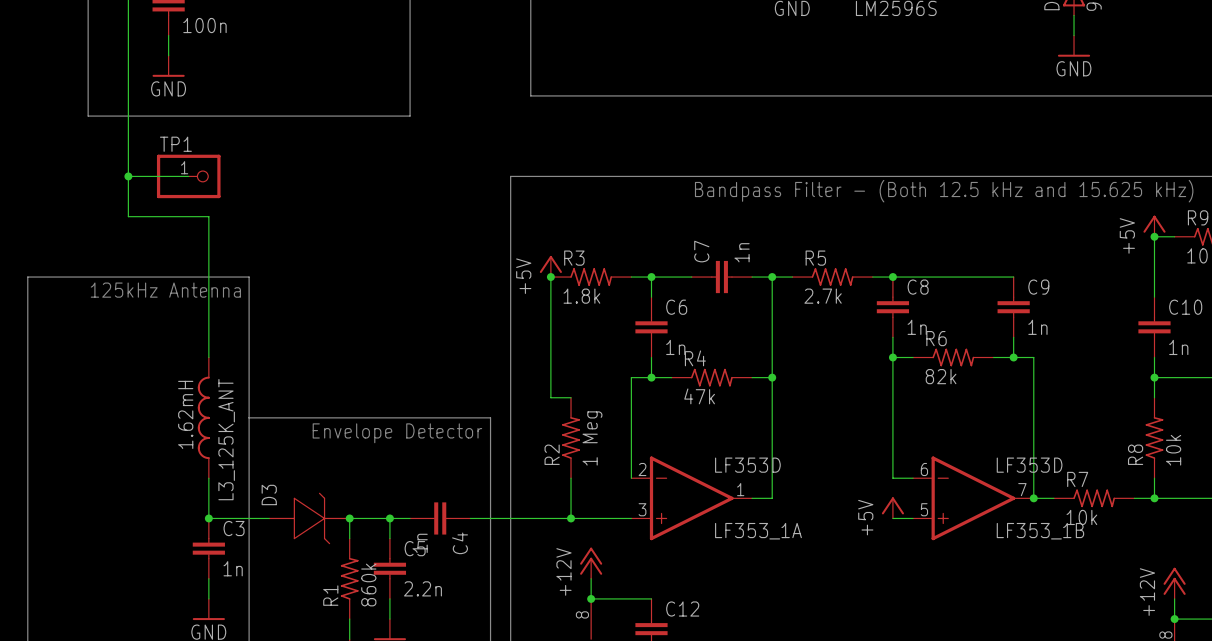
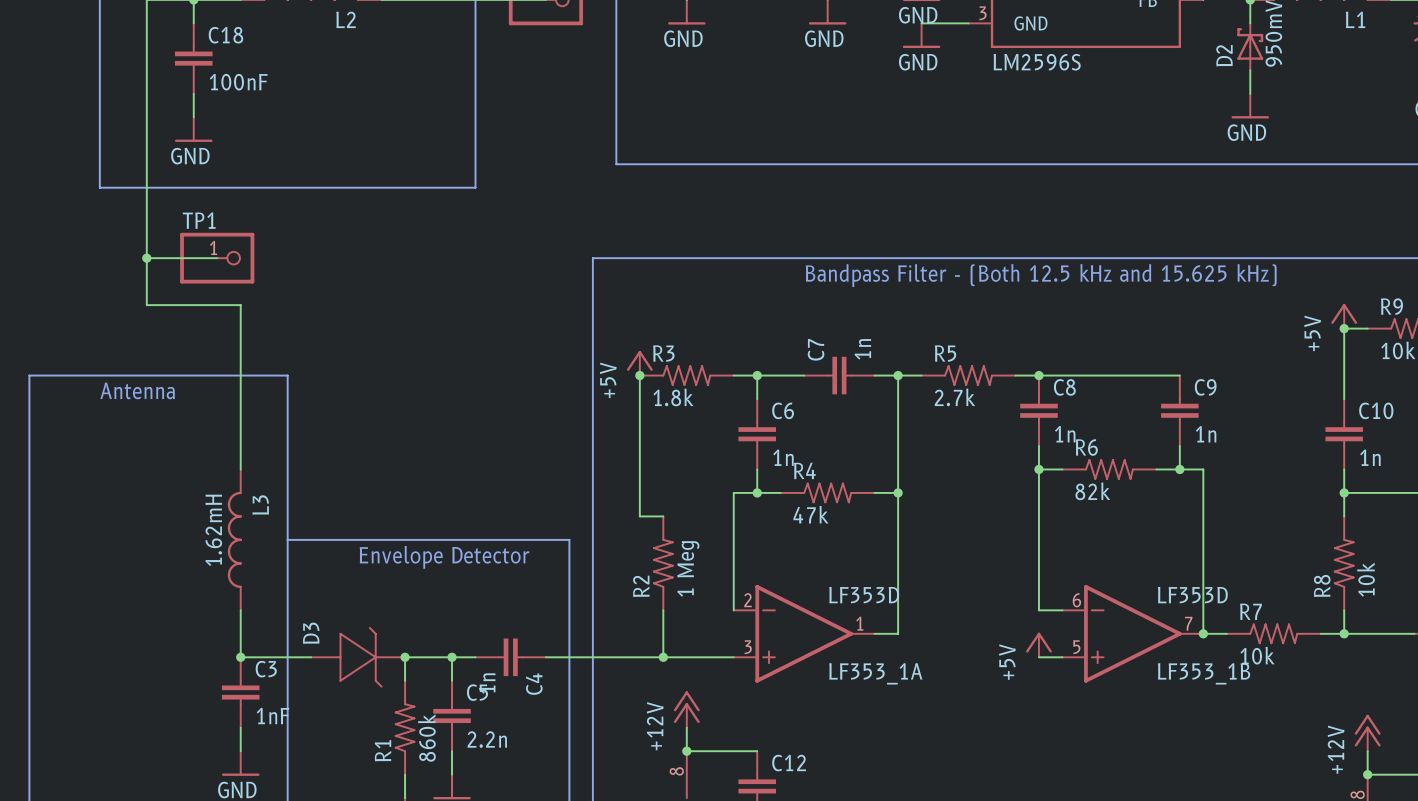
C18 value: 100n (204, 25) -> 100nF (238, 82)
text: 125kHz Antenna (165, 290) -> Antenna (137, 390)
L3_125K_ANT name: L3_125K_ANT (226, 439) -> L3 (260, 505)
C3 value: 1n (233, 568) -> 1nF (273, 715)

